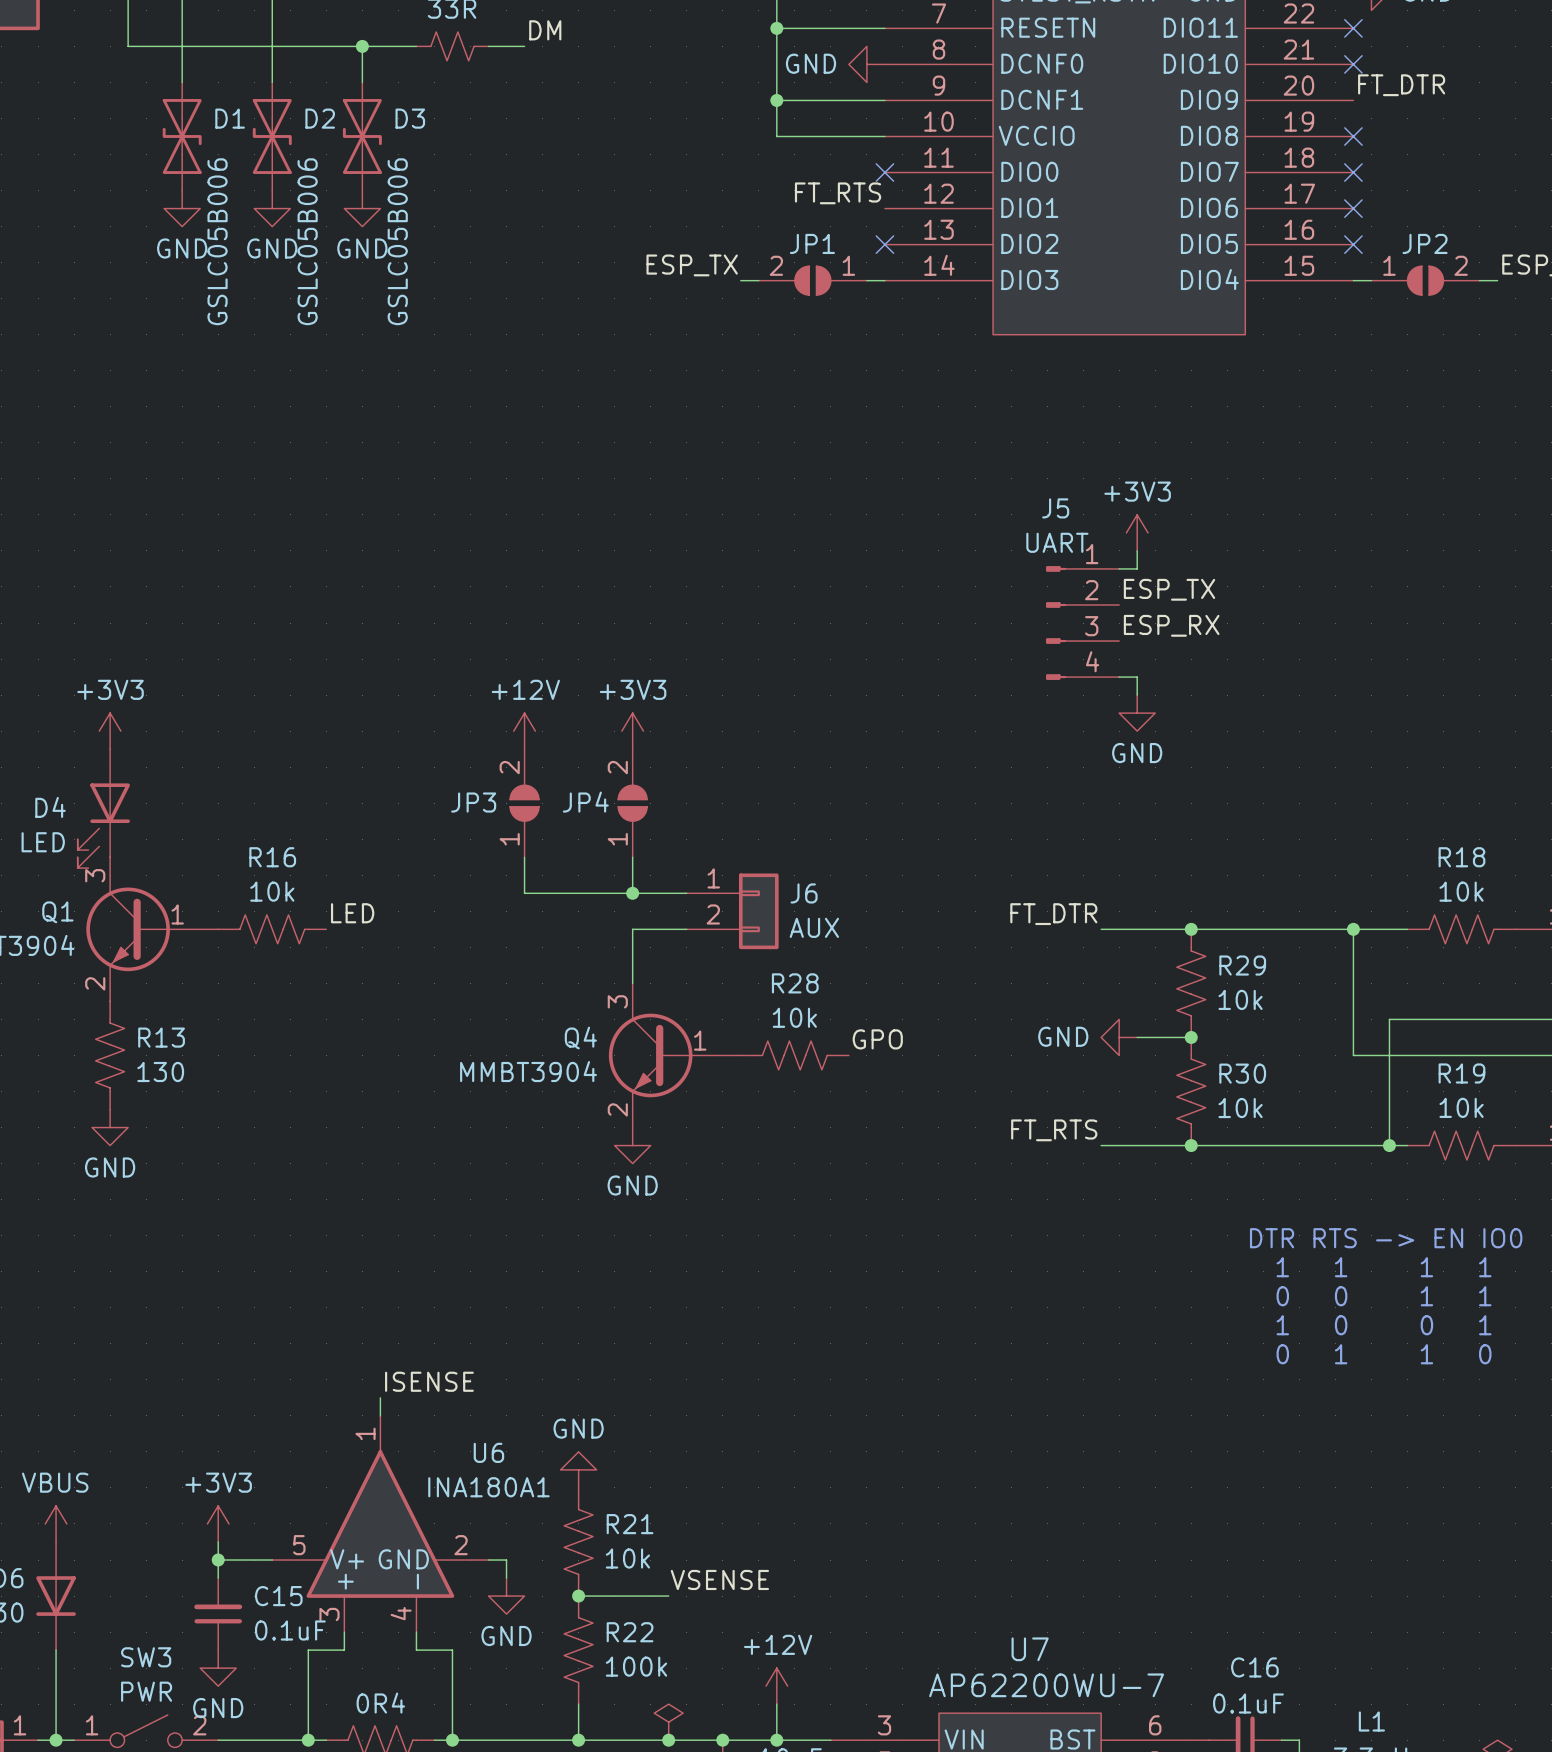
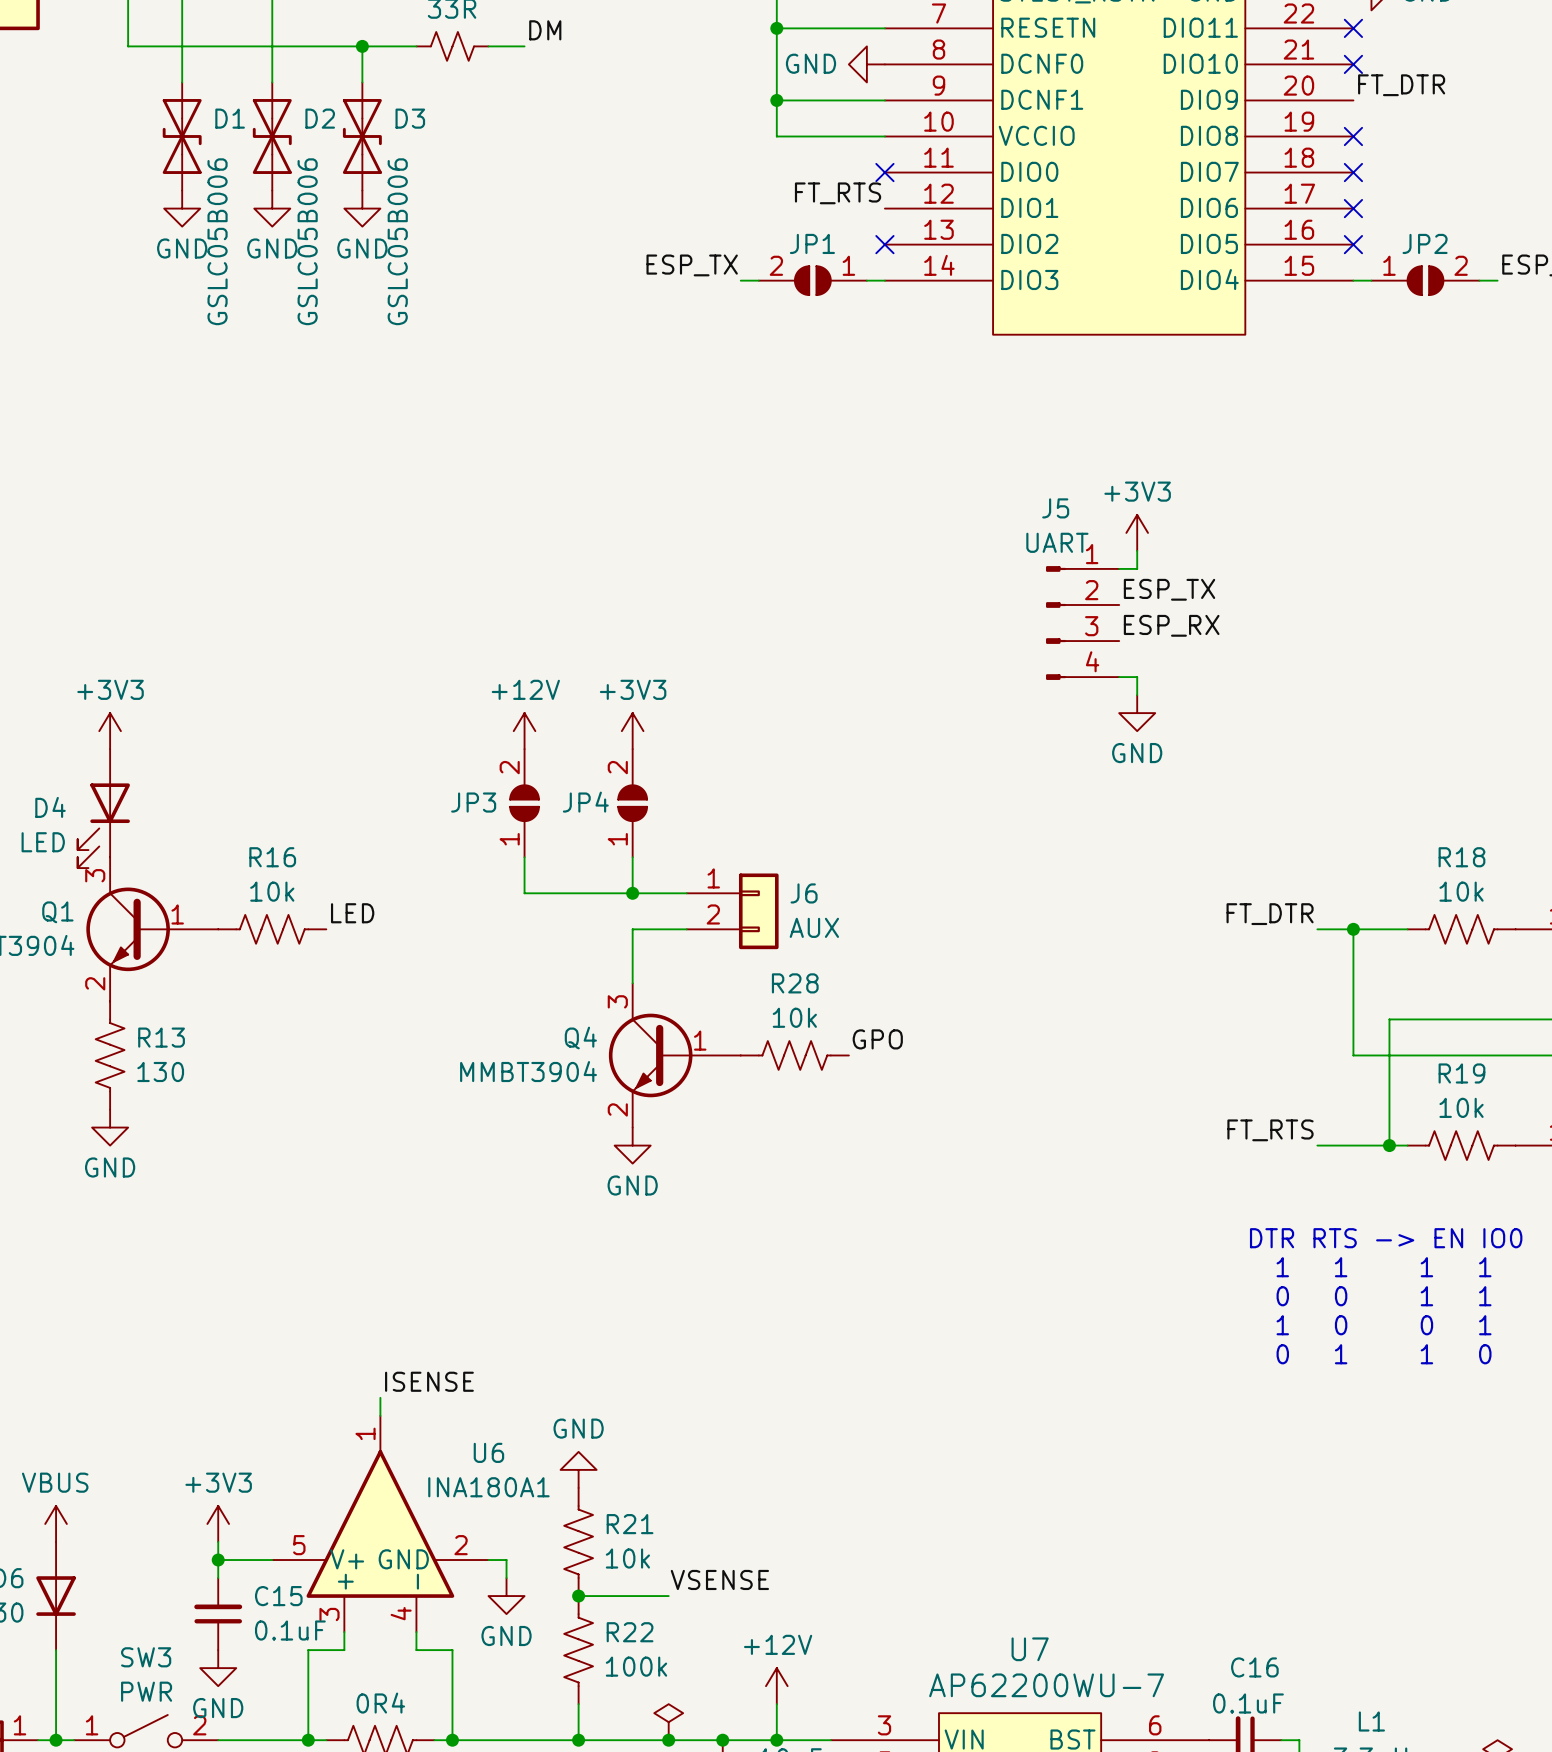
label position: FT_DTR (1053, 914) -> FT_DTR (1270, 914)
wire: (1101, 929) (1317, 929) -> none
junction: (1191, 929) -> none
R29: 10k (1191, 983) -> none
power symbol: GND (1119, 1037) -> none
wire: (1137, 1037) (1191, 1037) -> none
junction: (1191, 1037) -> none
R30: 10k (1191, 1091) -> none
label position: FT_RTS (1054, 1130) -> FT_RTS (1270, 1130)
wire: (1101, 1145) (1317, 1145) -> none
junction: (1191, 1145) -> none

